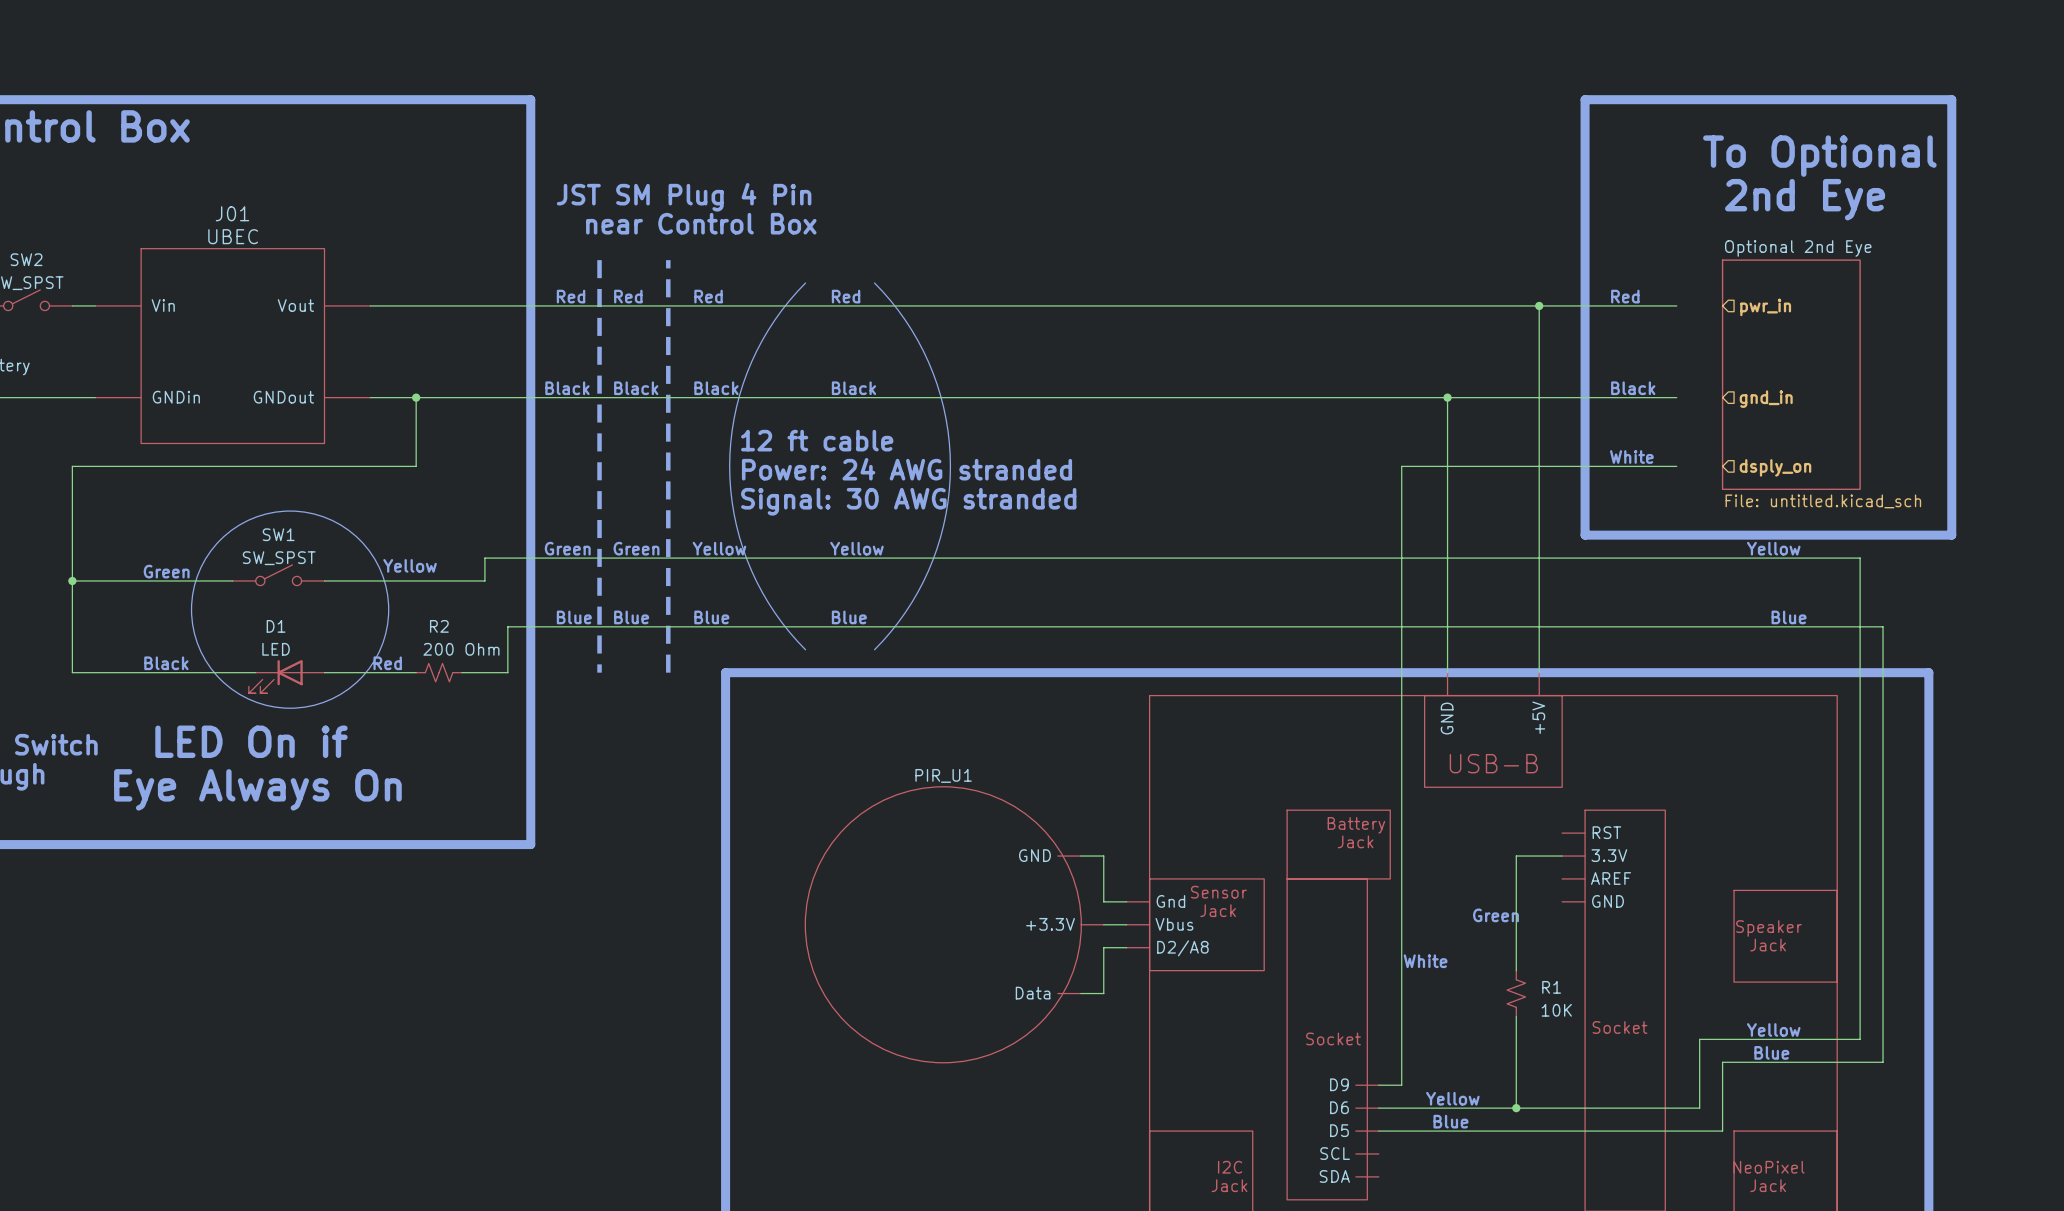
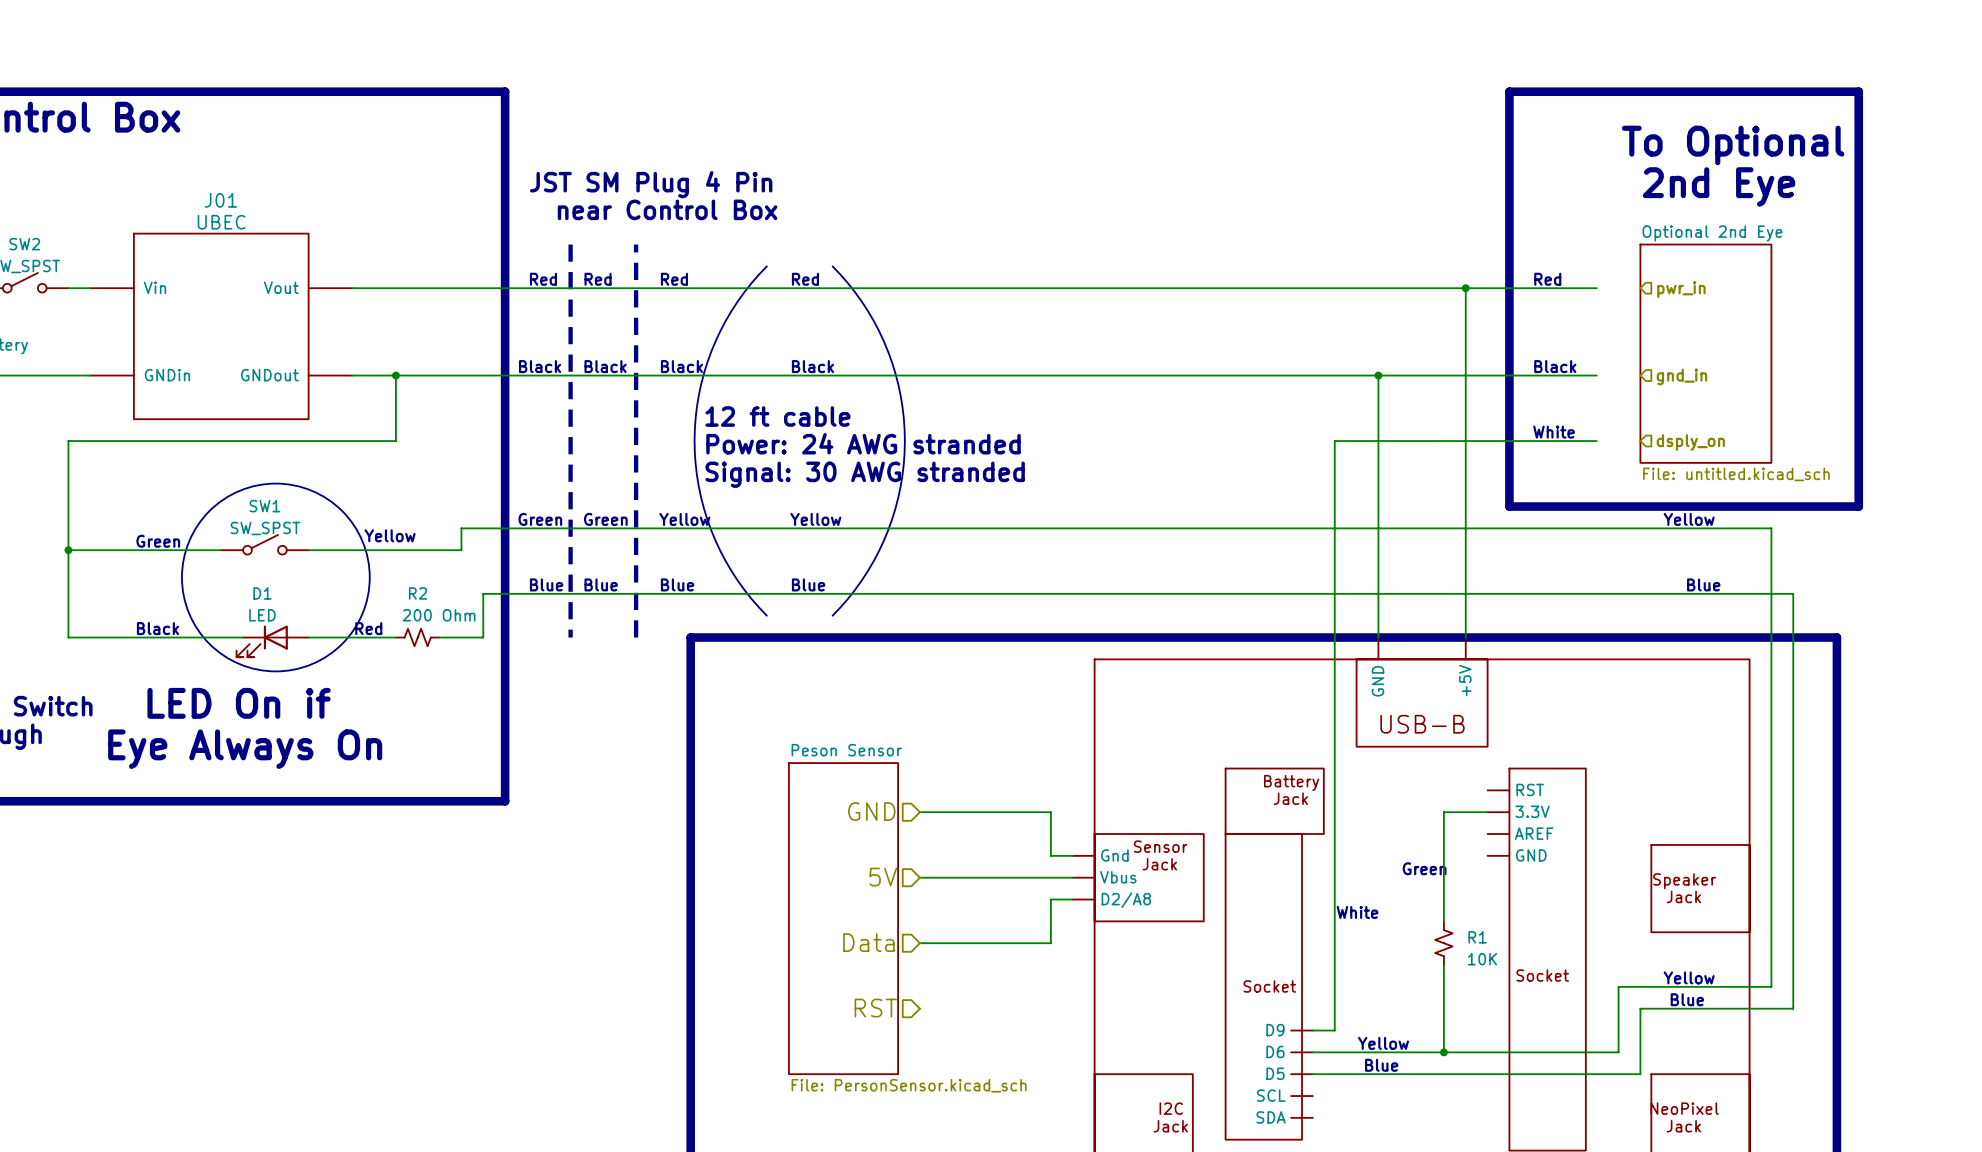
hierarchical label: none -> GND (871, 811)
wire: none -> (919, 812) (1029, 812)
hierarchical label: none -> 5V (883, 877)
PIR_U1: (954, 924) -> none
wire: none -> (919, 877) (1050, 877)
sheet Peson Sensor: none -> File: PersonSensor.kicad_sch (843, 918)
hierarchical label: none -> Data (868, 942)
wire: none -> (919, 943) (1029, 943)
hierarchical label: none -> RST (875, 1008)

